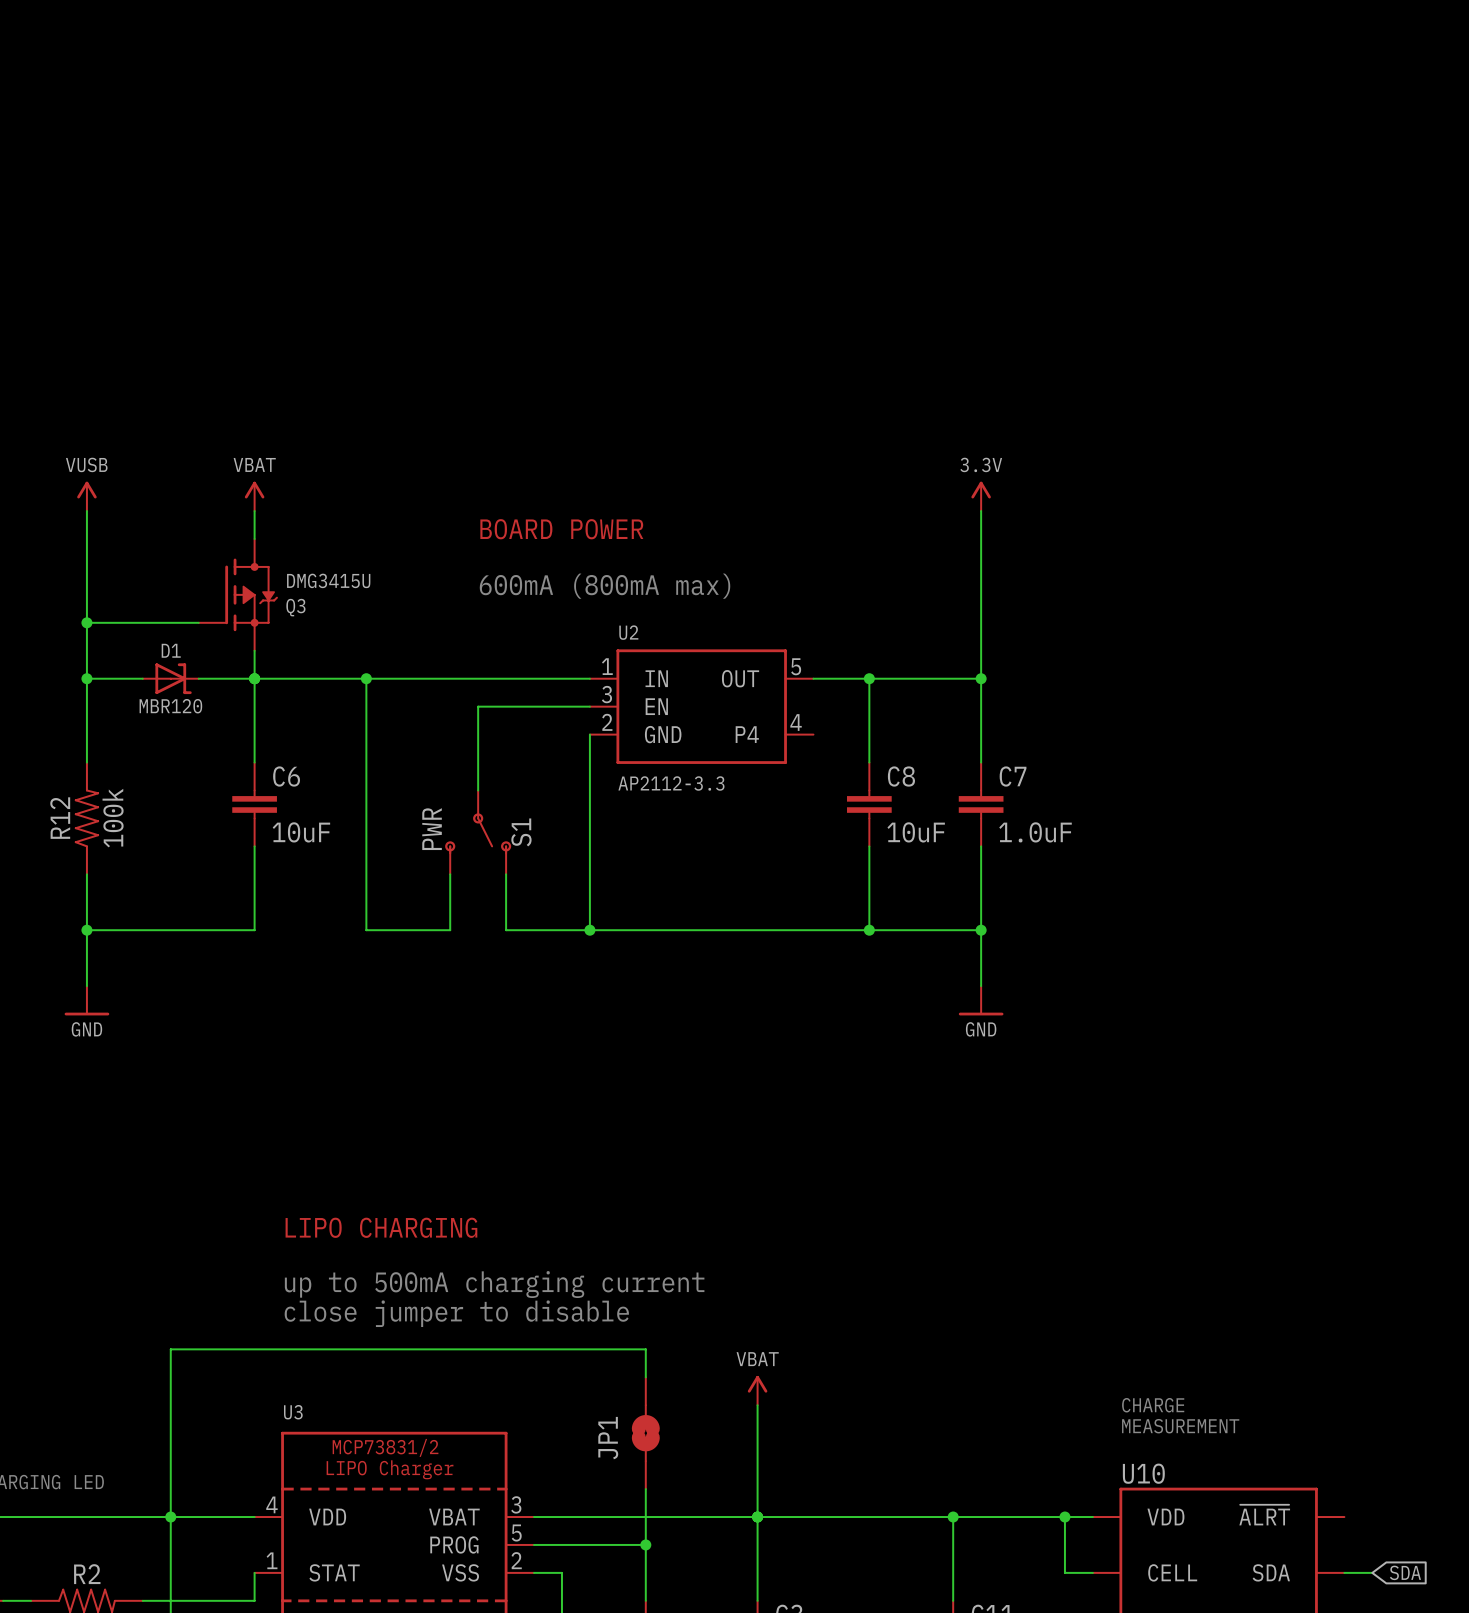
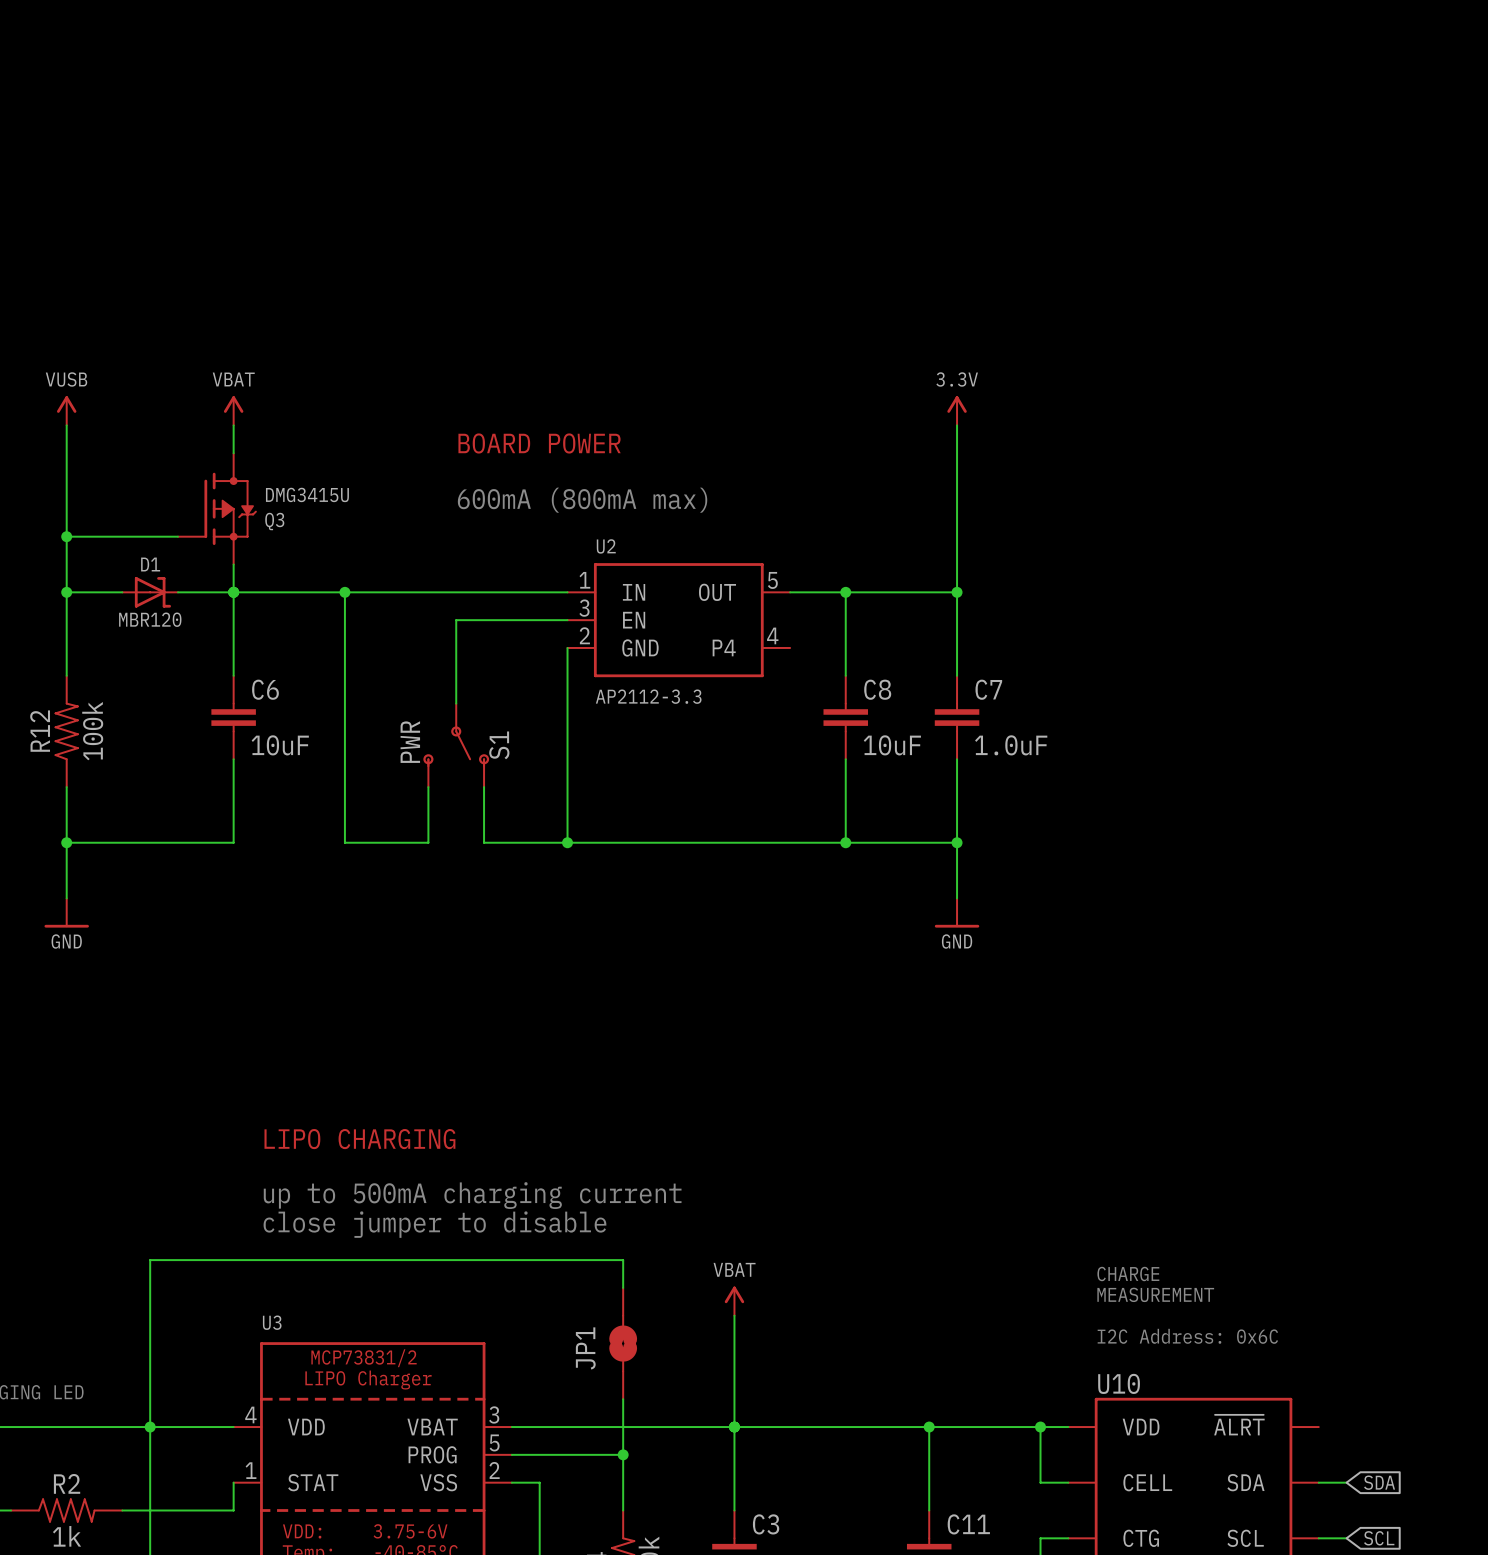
text: none -> MEASUREMENT (1155, 1294)
text position: CHARGE (1153, 1405) -> CHARGE (1128, 1274)
text: MEASUREMENT (1180, 1426) -> I2C Address: 0x6C (1187, 1336)

